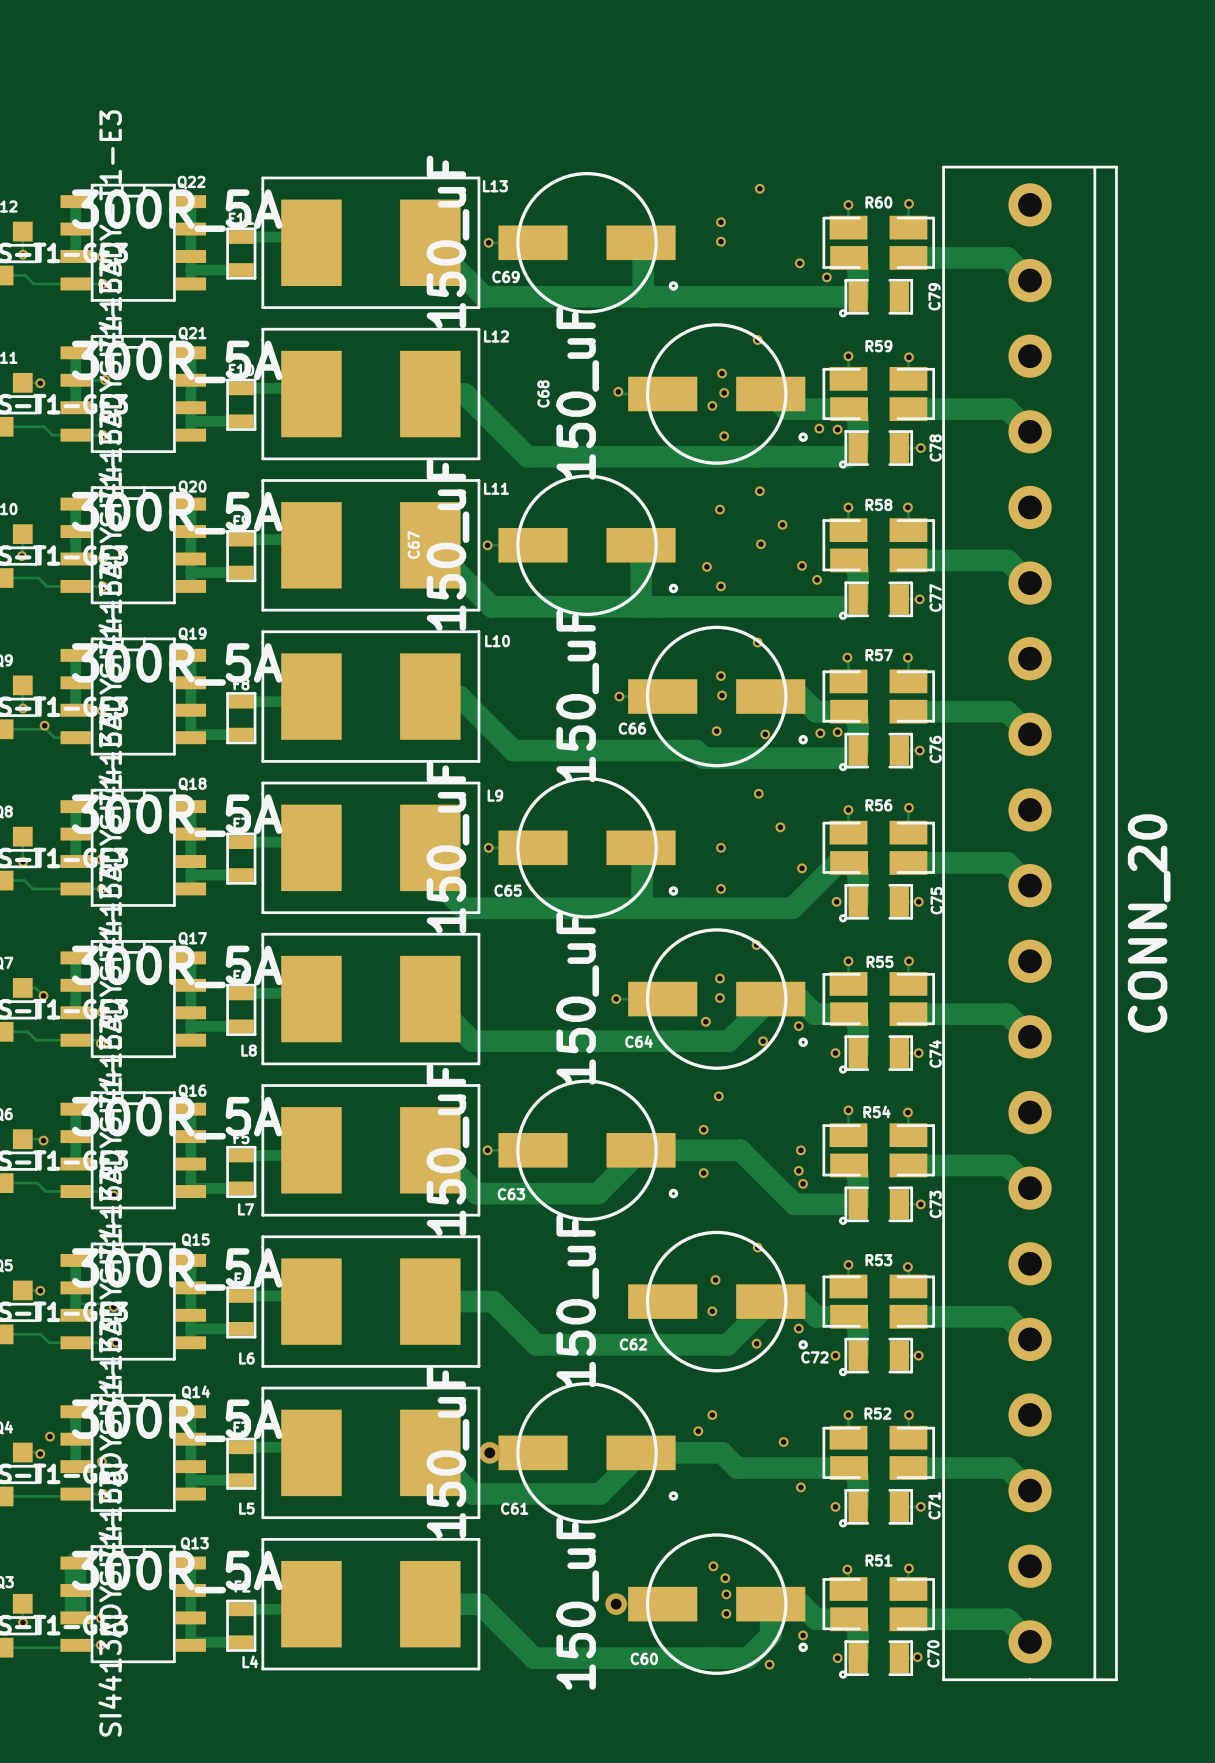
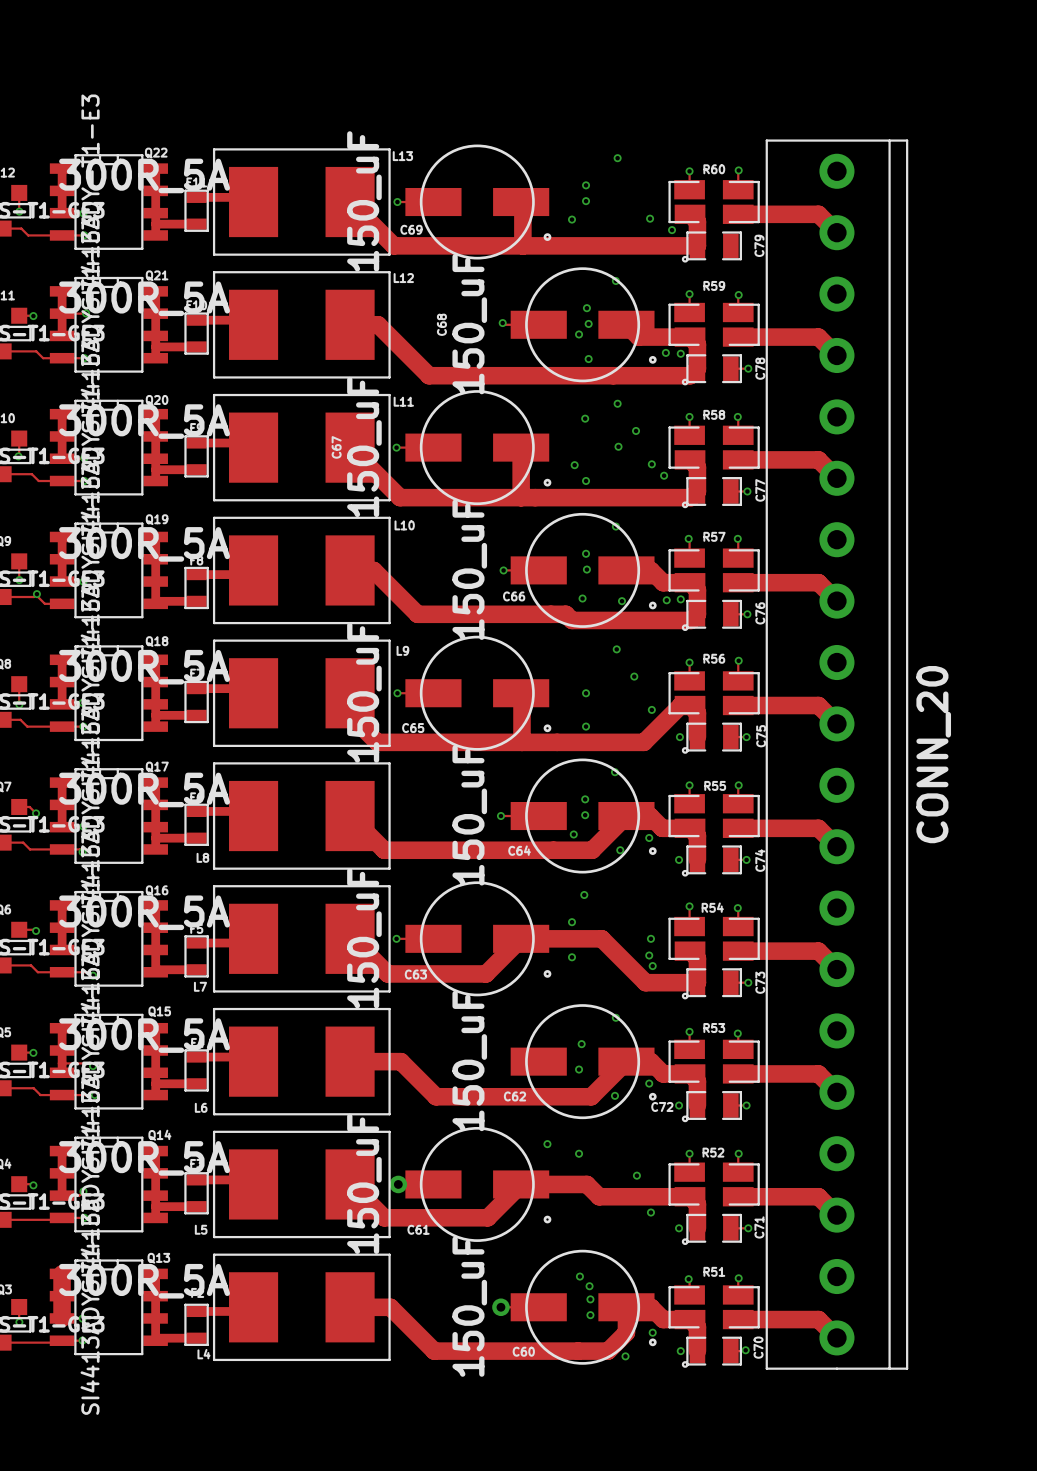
via: none -> (571, 219)
via position: (698, 1431) -> (547, 1144)
via: (50, 1436) -> none

